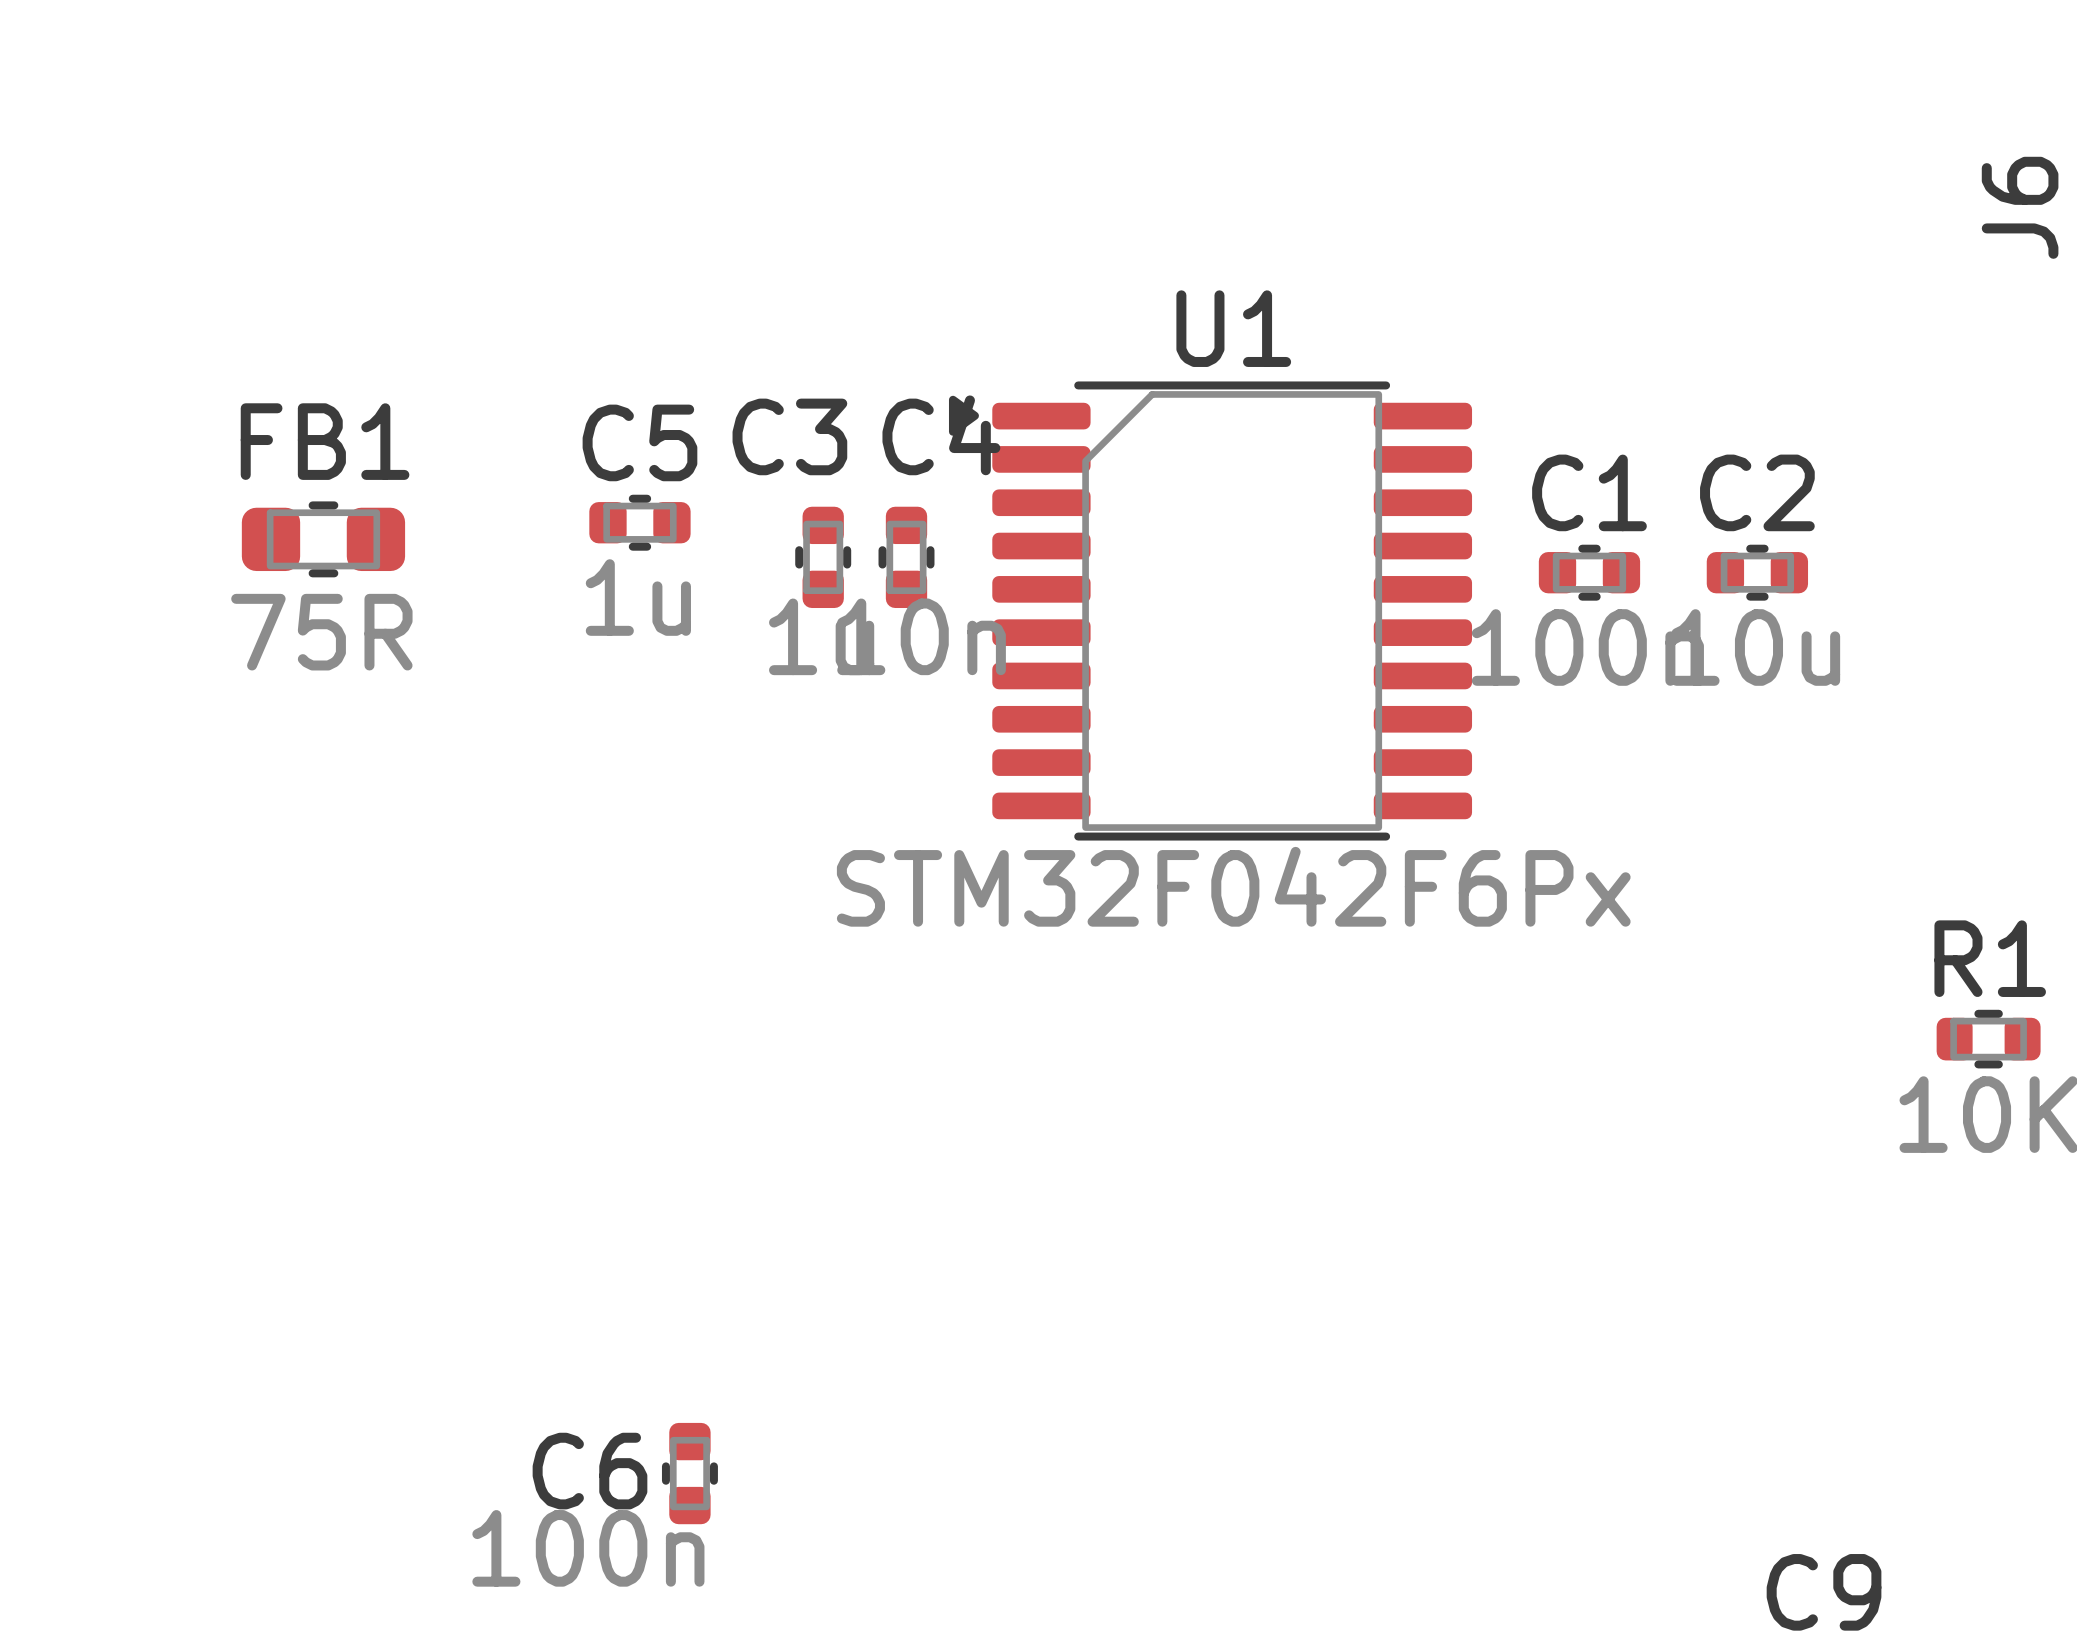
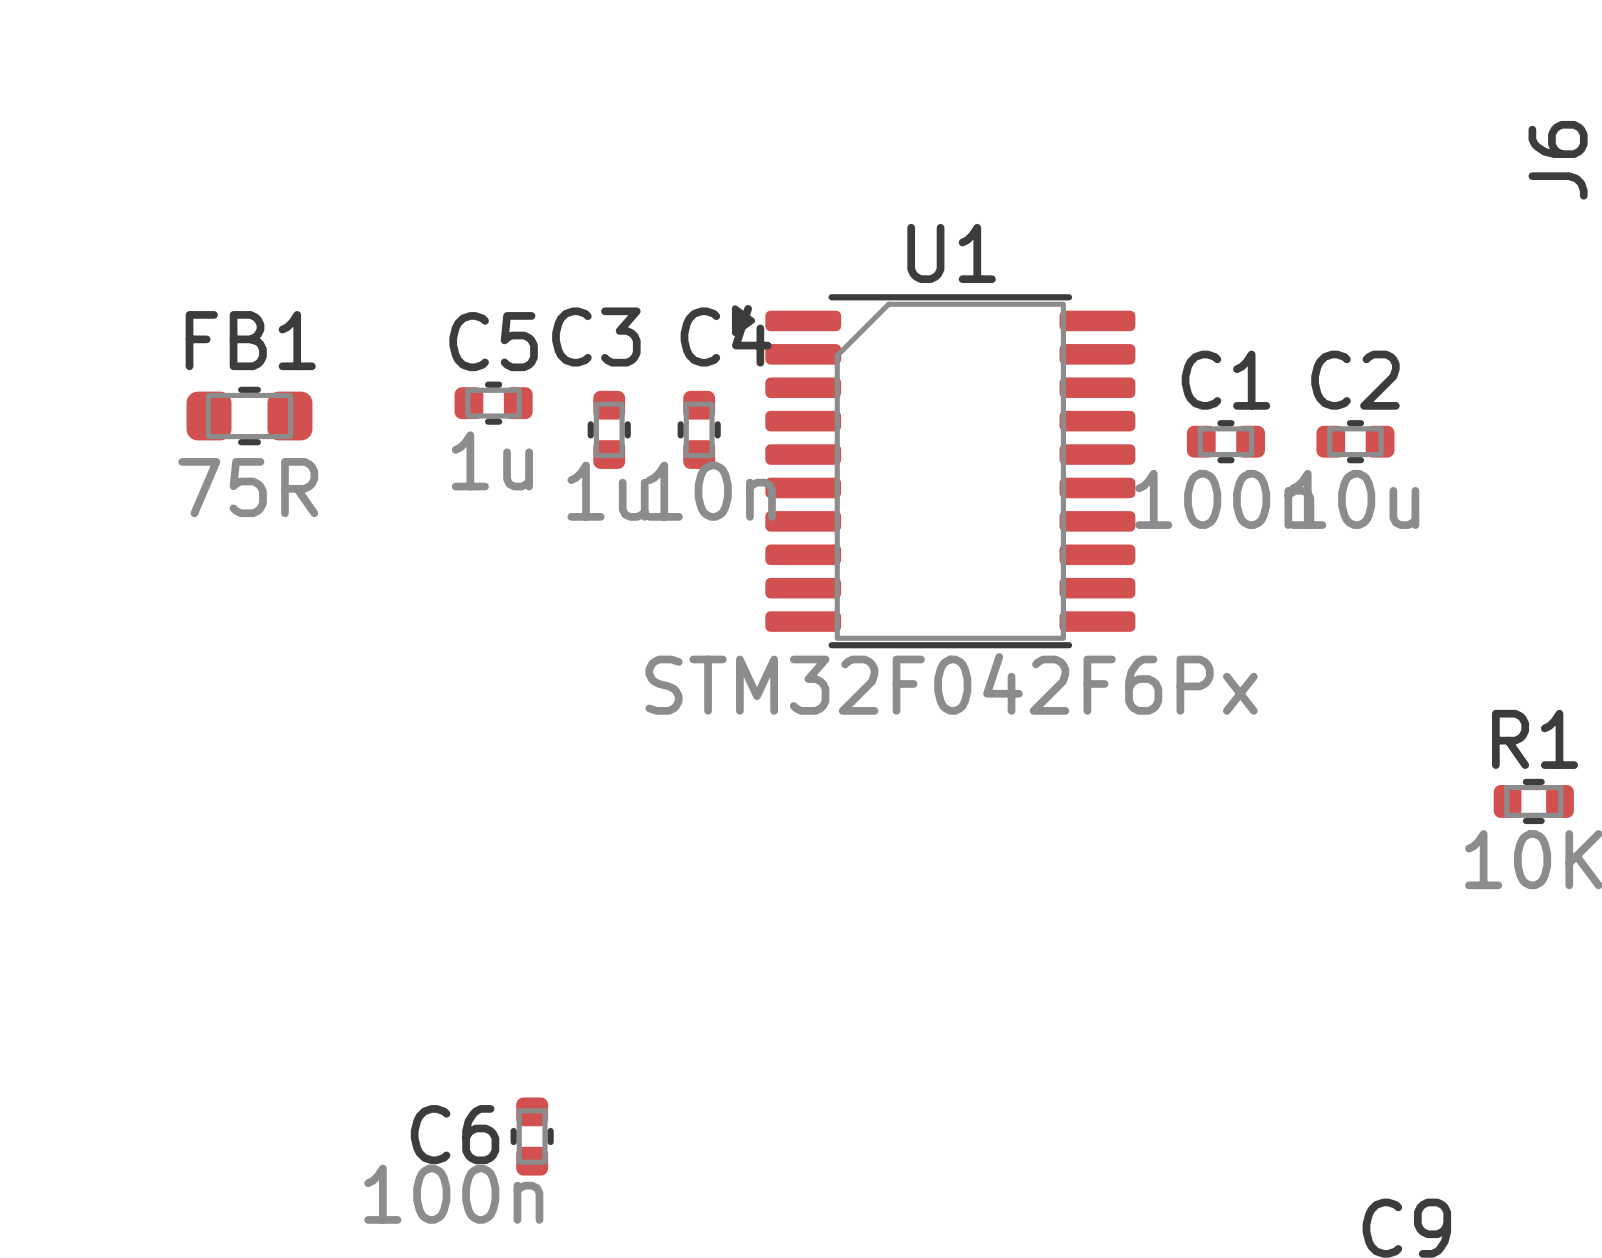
C3 name position: C3 (789, 436) -> C3 (596, 337)
C3 position: (823, 557) -> (609, 429)

